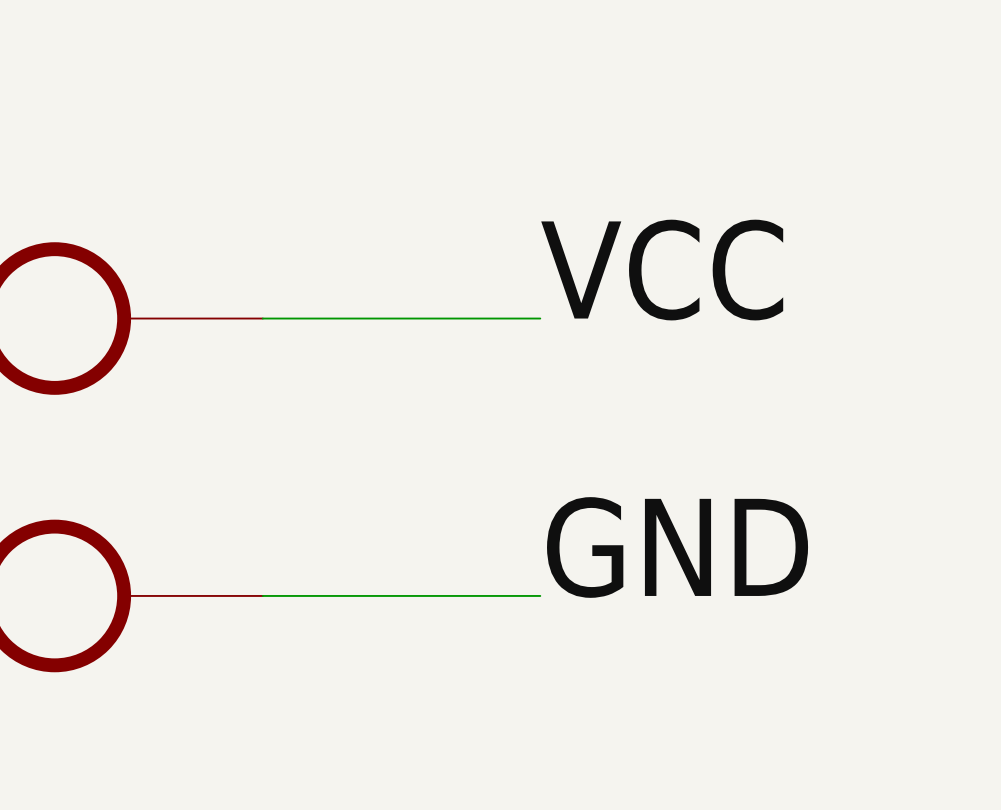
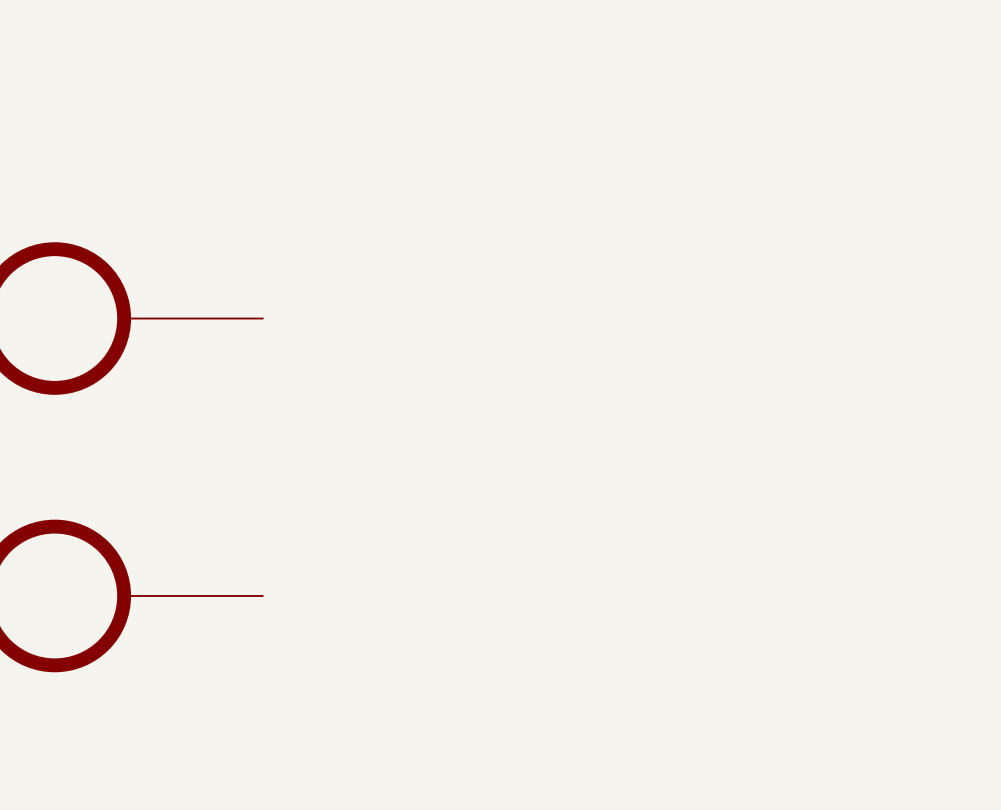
label: VCC (662, 270) -> none
wire: (262, 318) (540, 318) -> none
label: GND (677, 547) -> none
wire: (262, 595) (540, 595) -> none

